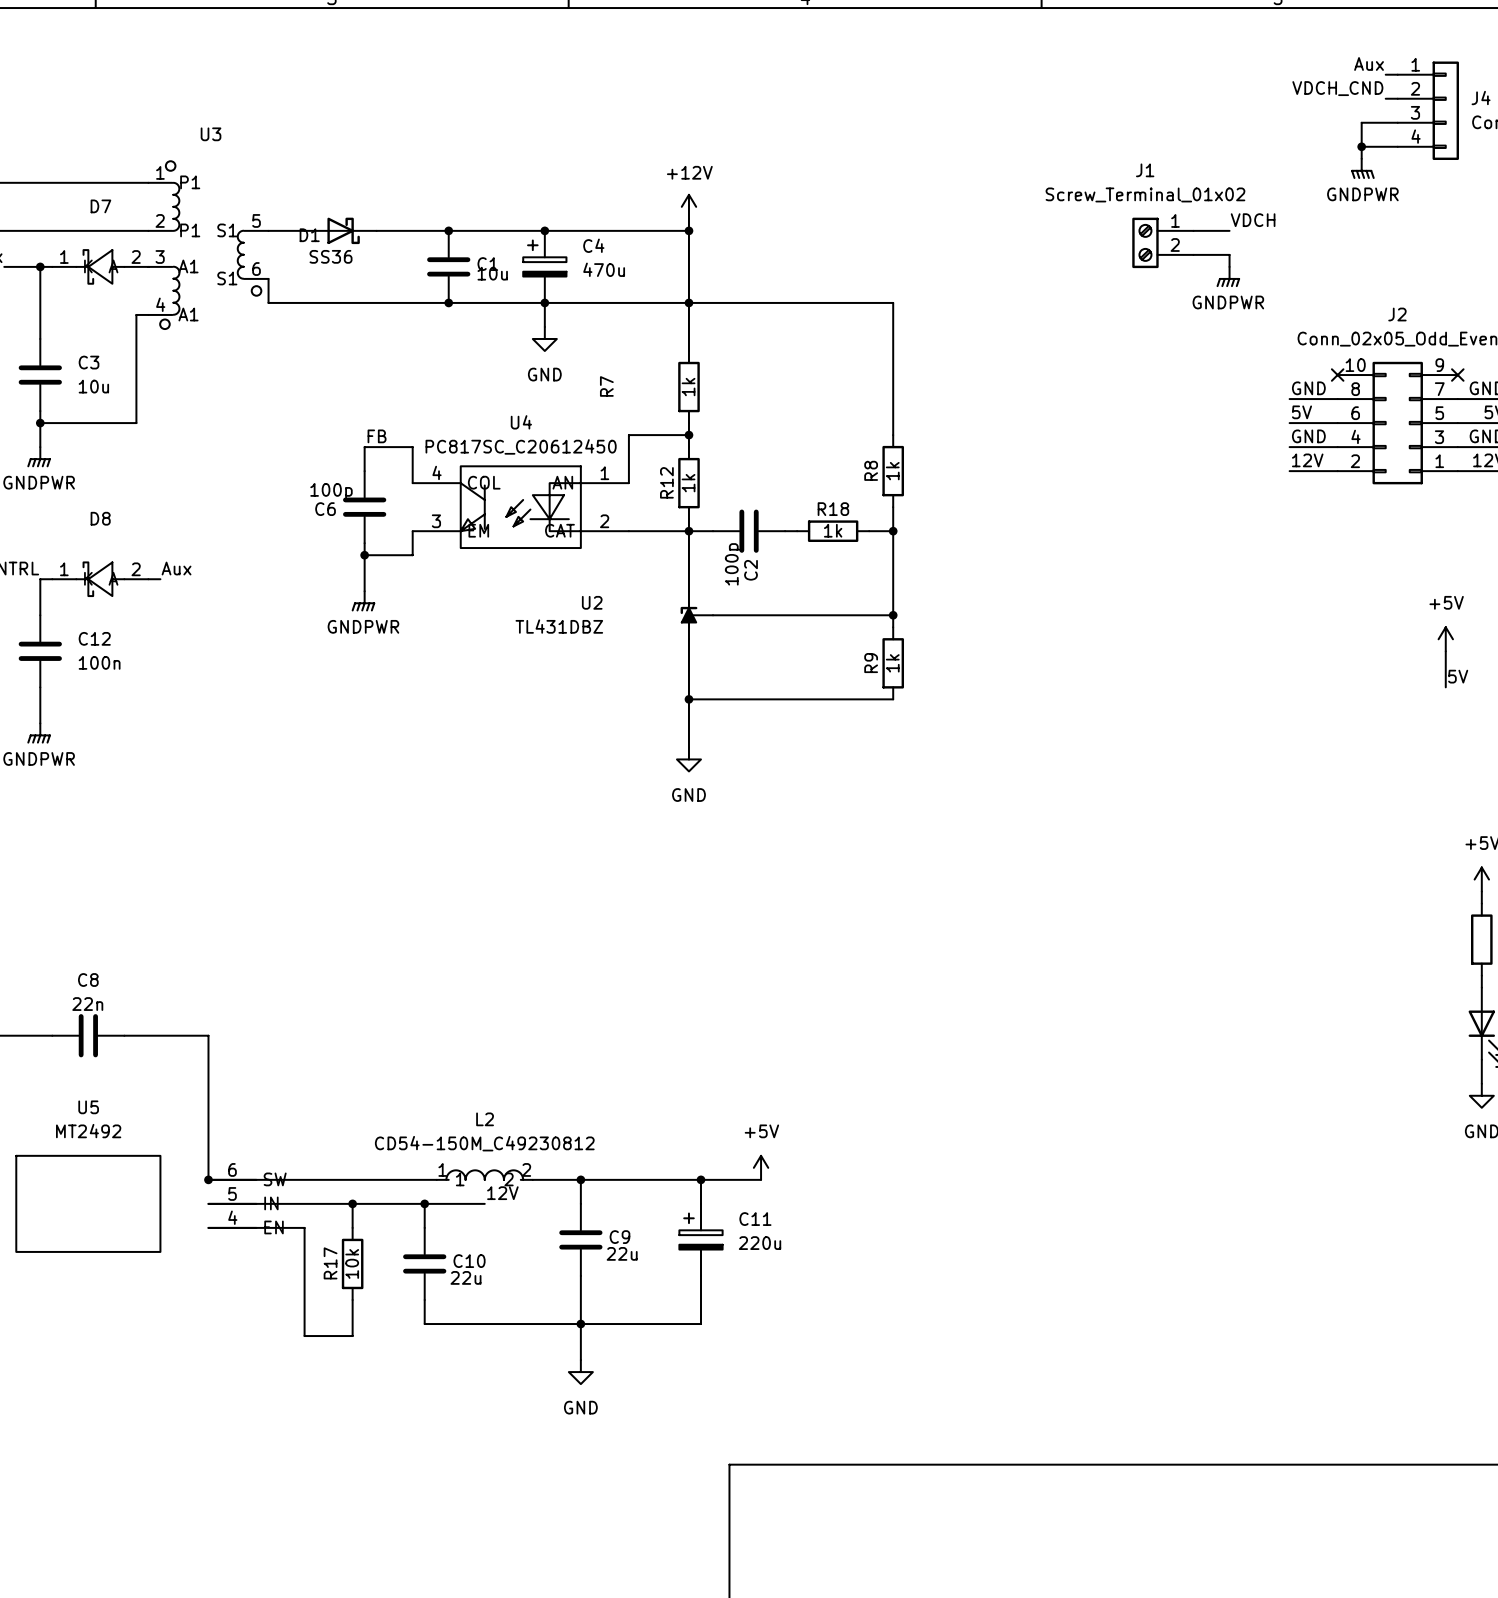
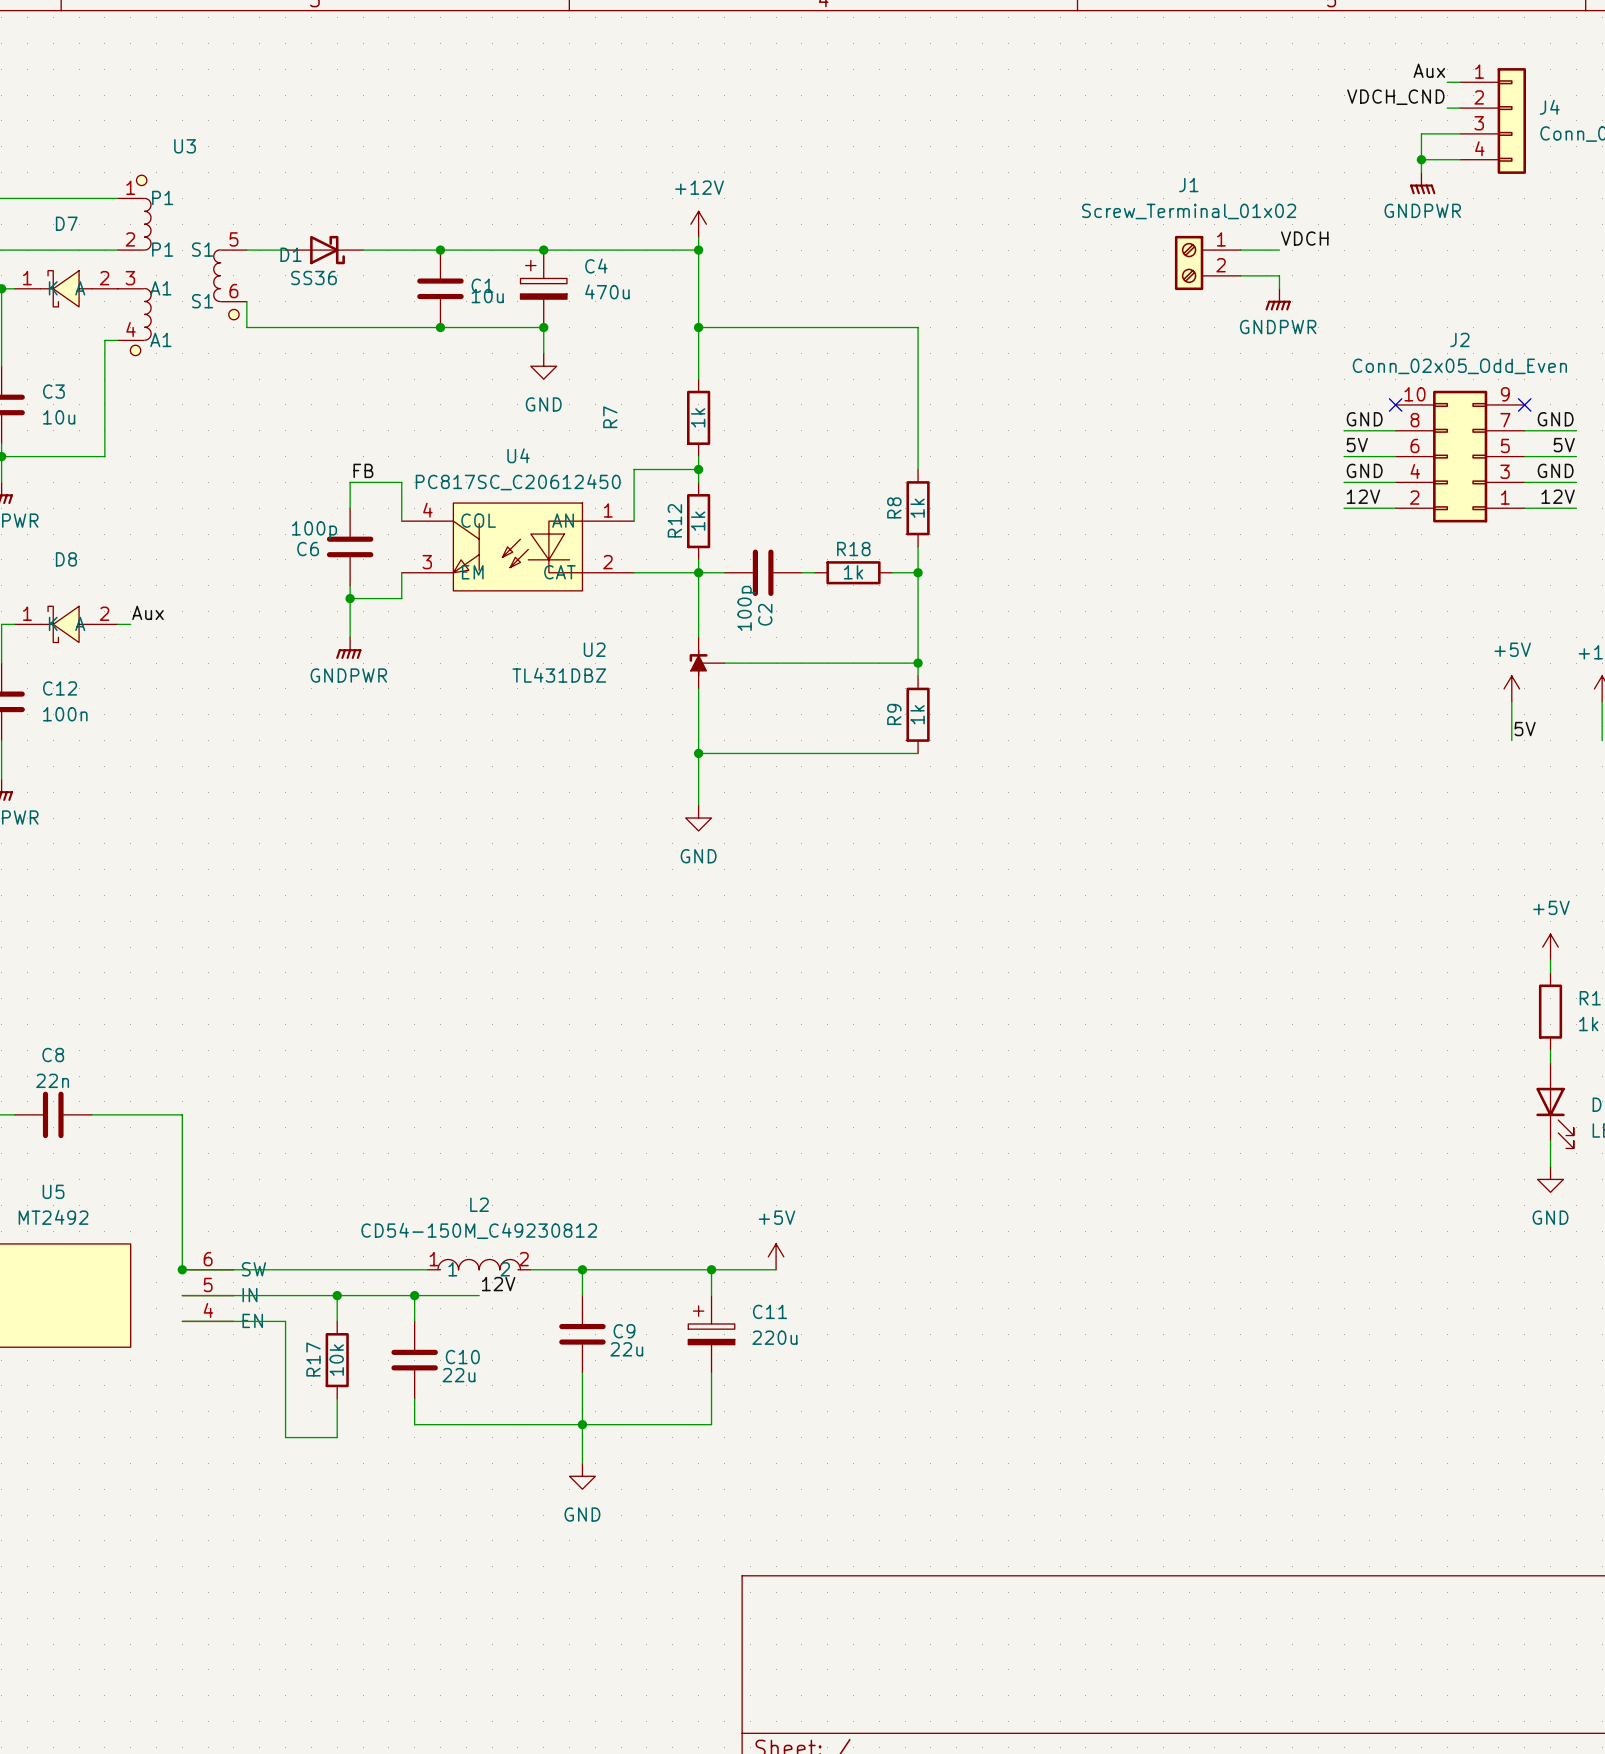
wire: (544, 302) (688, 302) -> none

